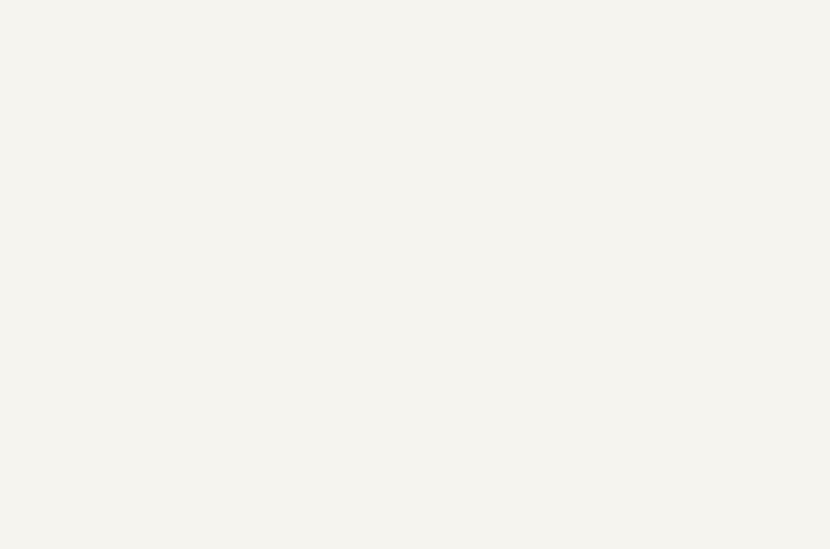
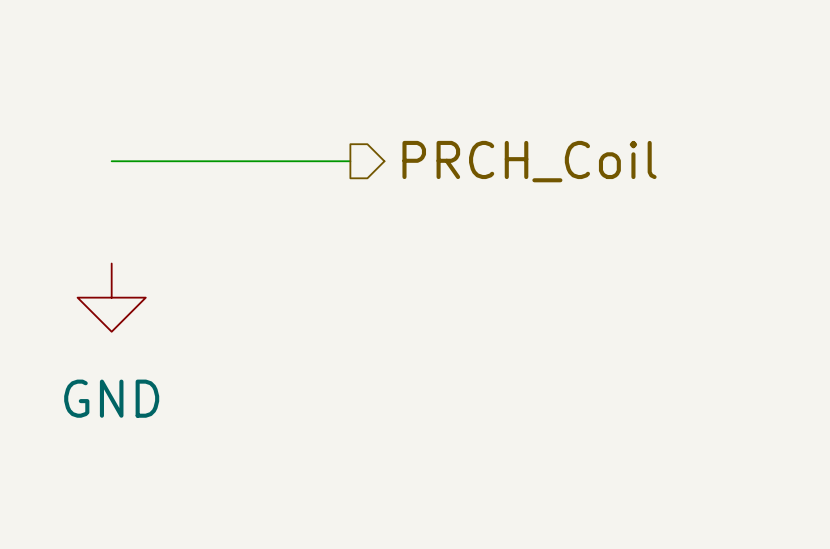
wire: none -> (111, 161) (350, 161)
hierarchical label: none -> PRCH_Coil (529, 161)
power symbol: none -> GND (111, 297)

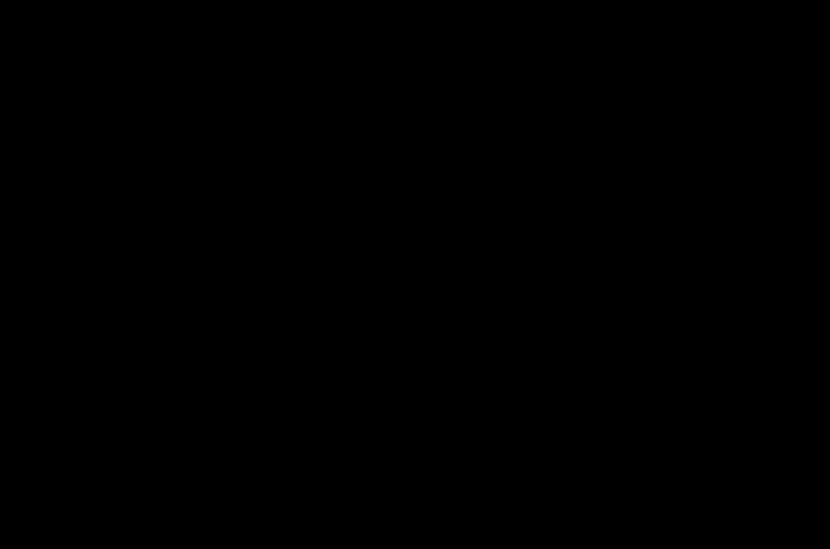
wire: (111, 161) (350, 161) -> none
hierarchical label: PRCH_Coil (529, 161) -> none
power symbol: GND (111, 297) -> none

